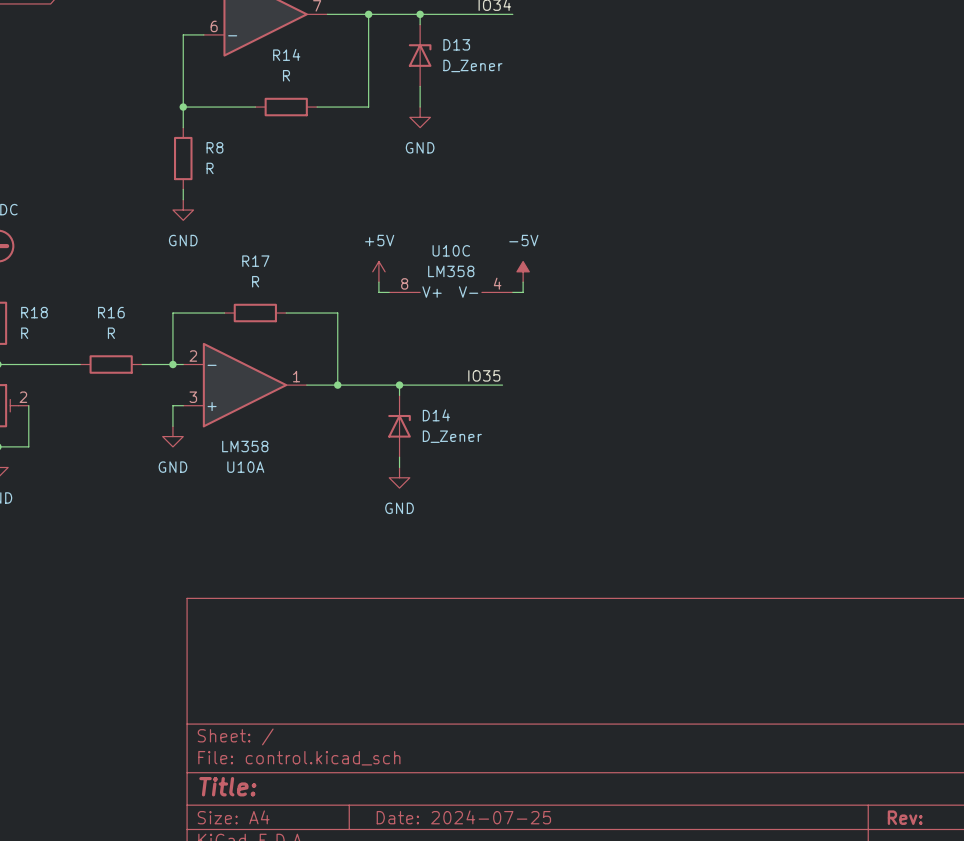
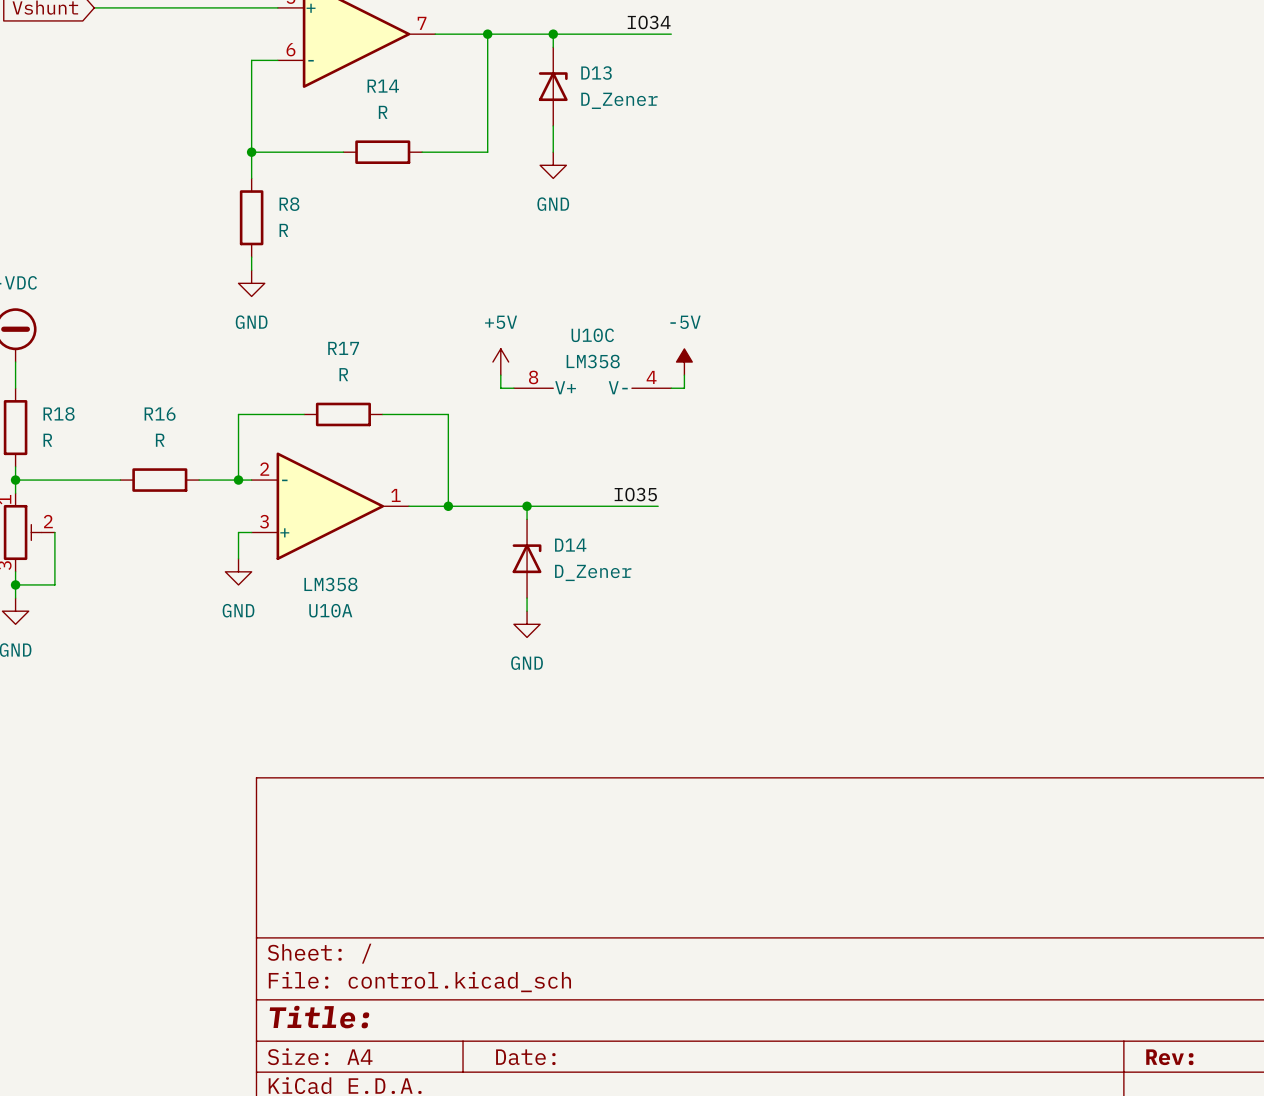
title block: Date: 2024-07-25 (463, 817) -> Date: (525, 1057)

